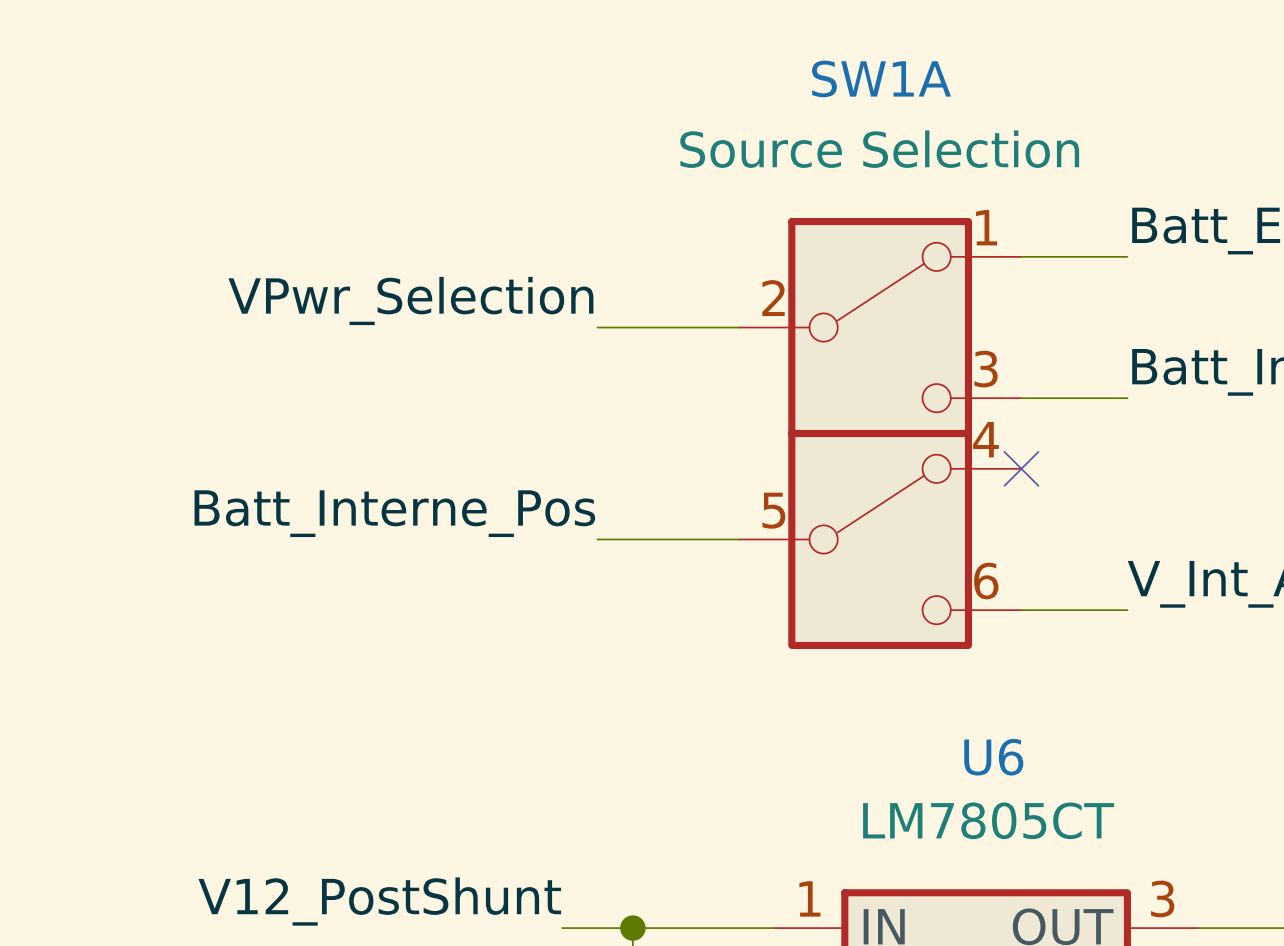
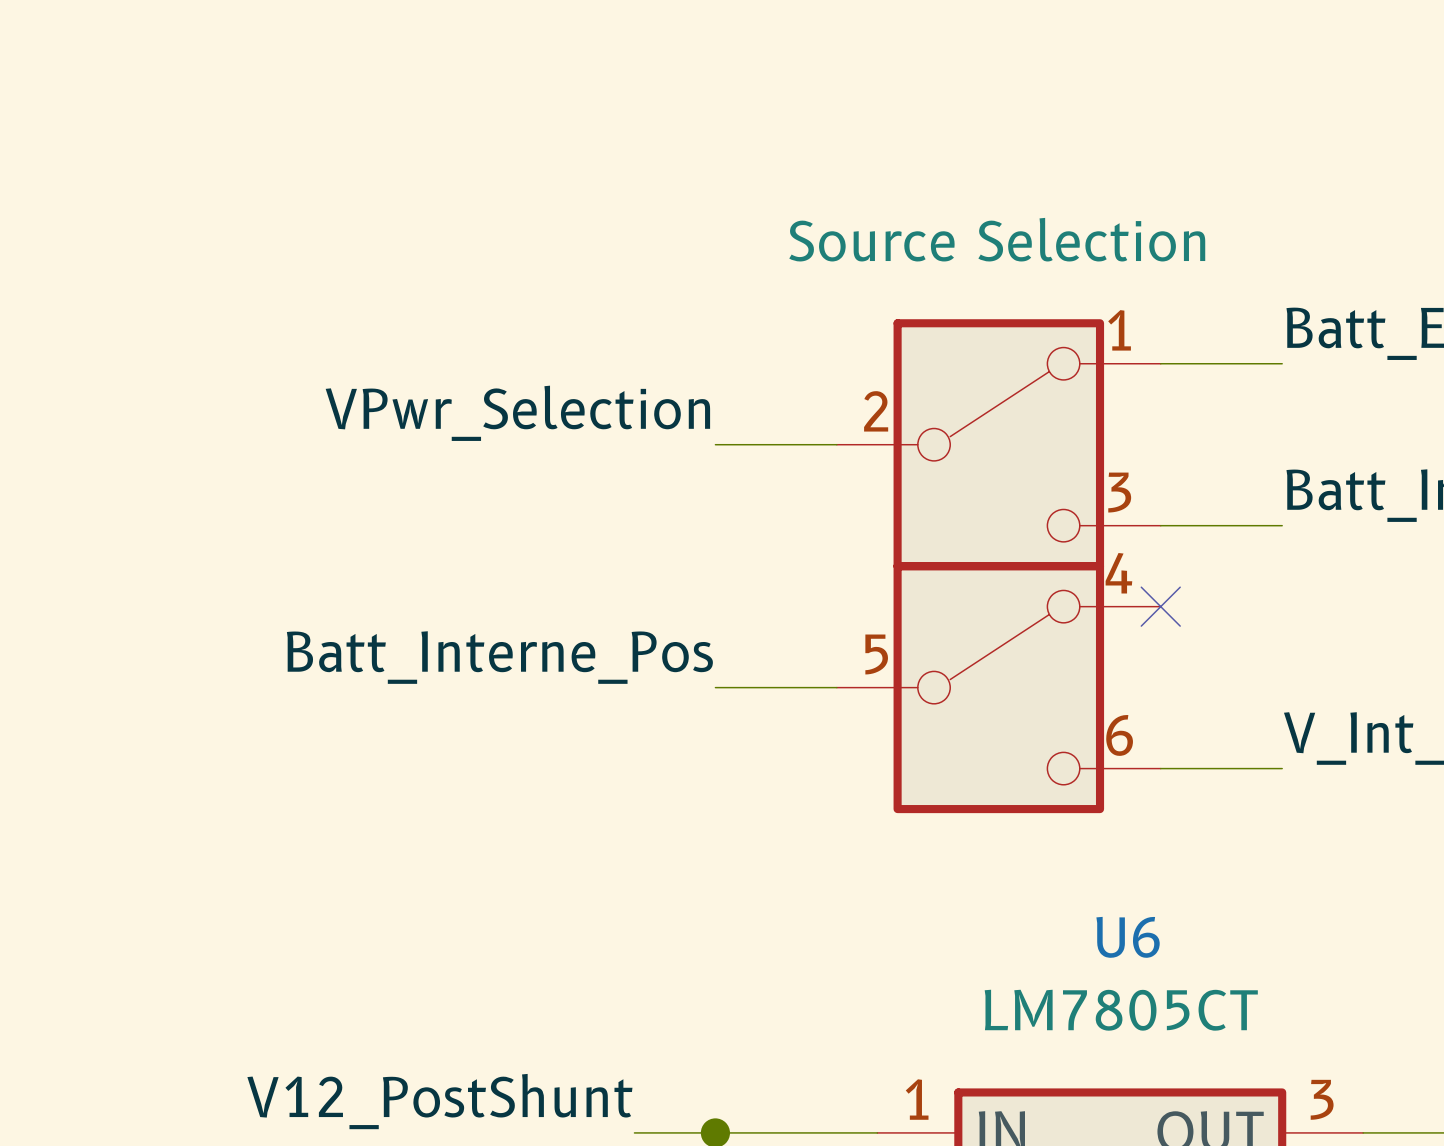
SW1A name: SW1A (881, 78) -> none
label position: VPwr_Selection (410, 300) -> VPwr_Selection (517, 413)
wire: (597, 327) (632, 327) -> none
label position: Batt_Interne_Pos (394, 513) -> Batt_Interne_Pos (499, 657)
wire: (597, 539) (632, 539) -> none

